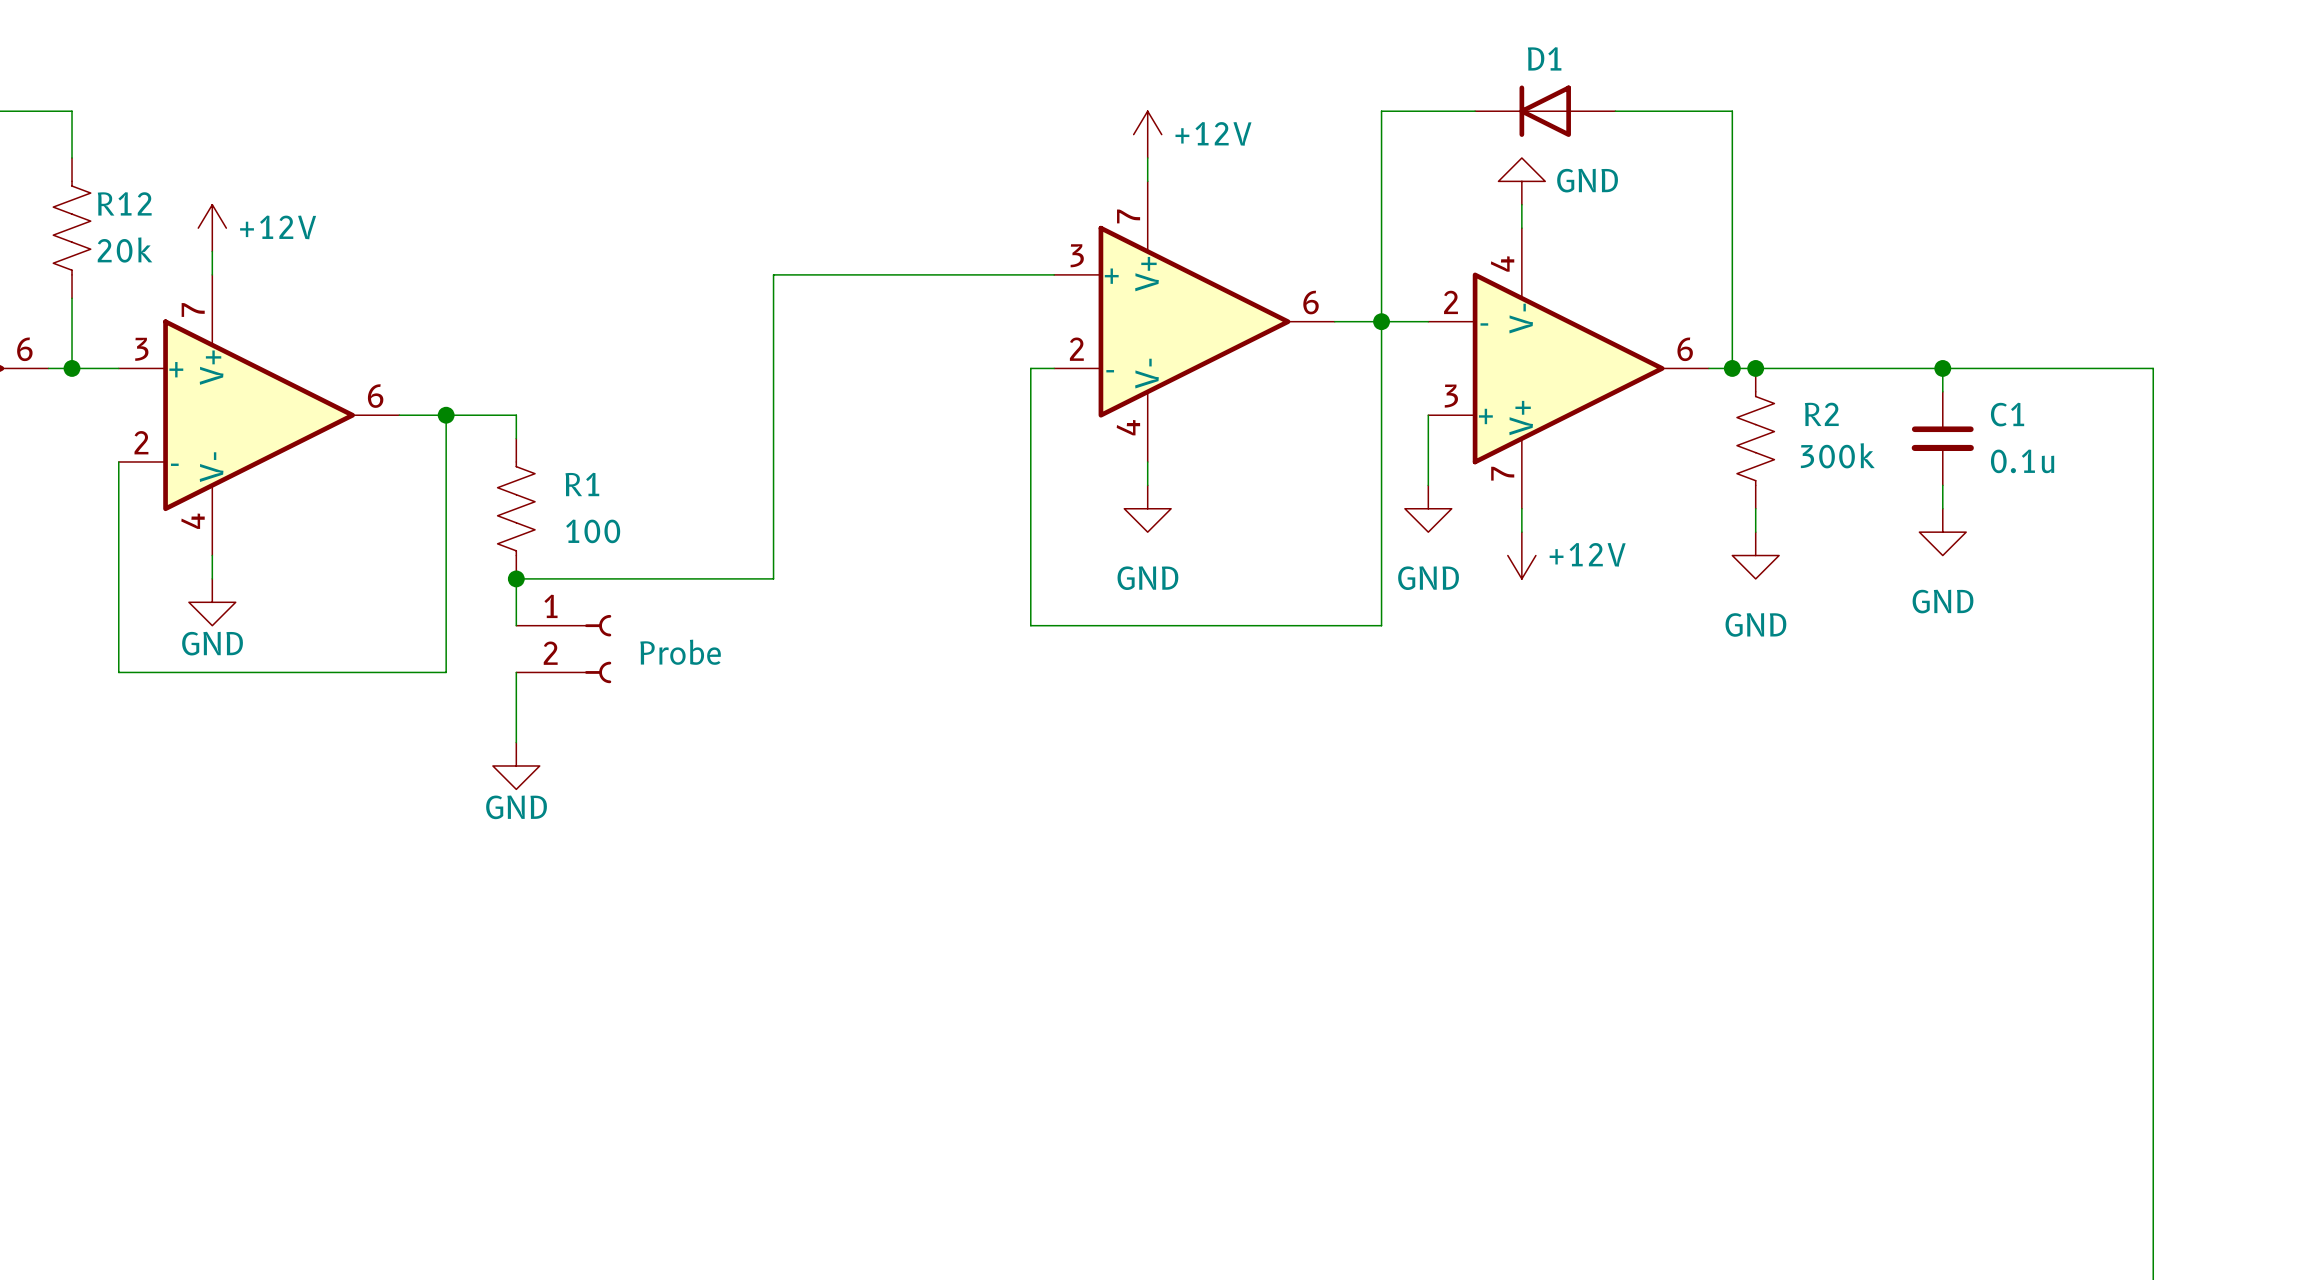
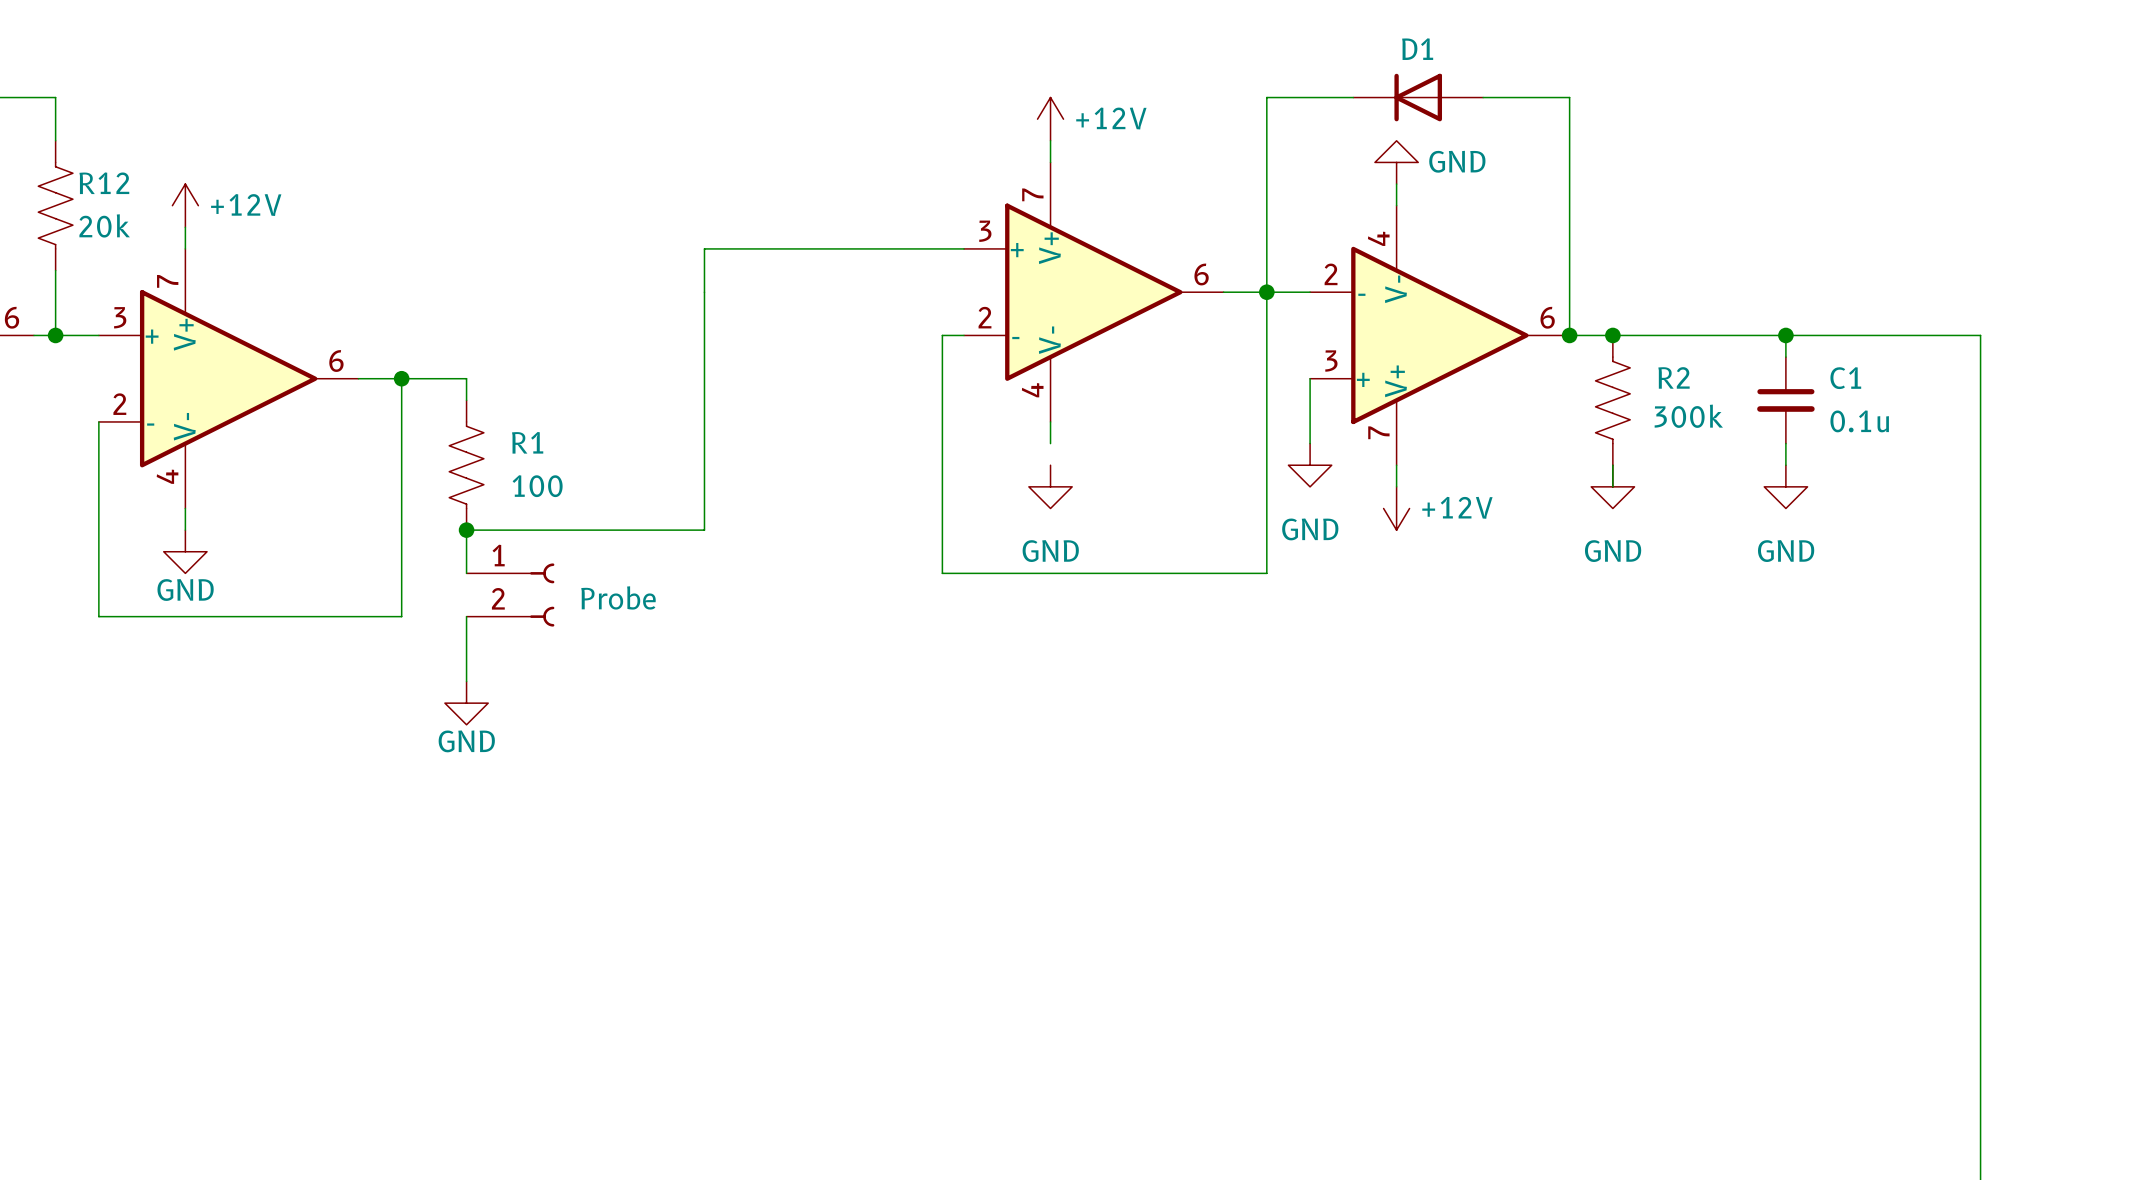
wire: (1708, 111) (1732, 111) (1732, 368) -> (1569, 97) (1569, 335)
junction position: (1732, 368) -> (1569, 335)
power symbol position: GND (1147, 508) -> GND (1050, 486)
power symbol position: GND (1755, 555) -> GND (1612, 486)

